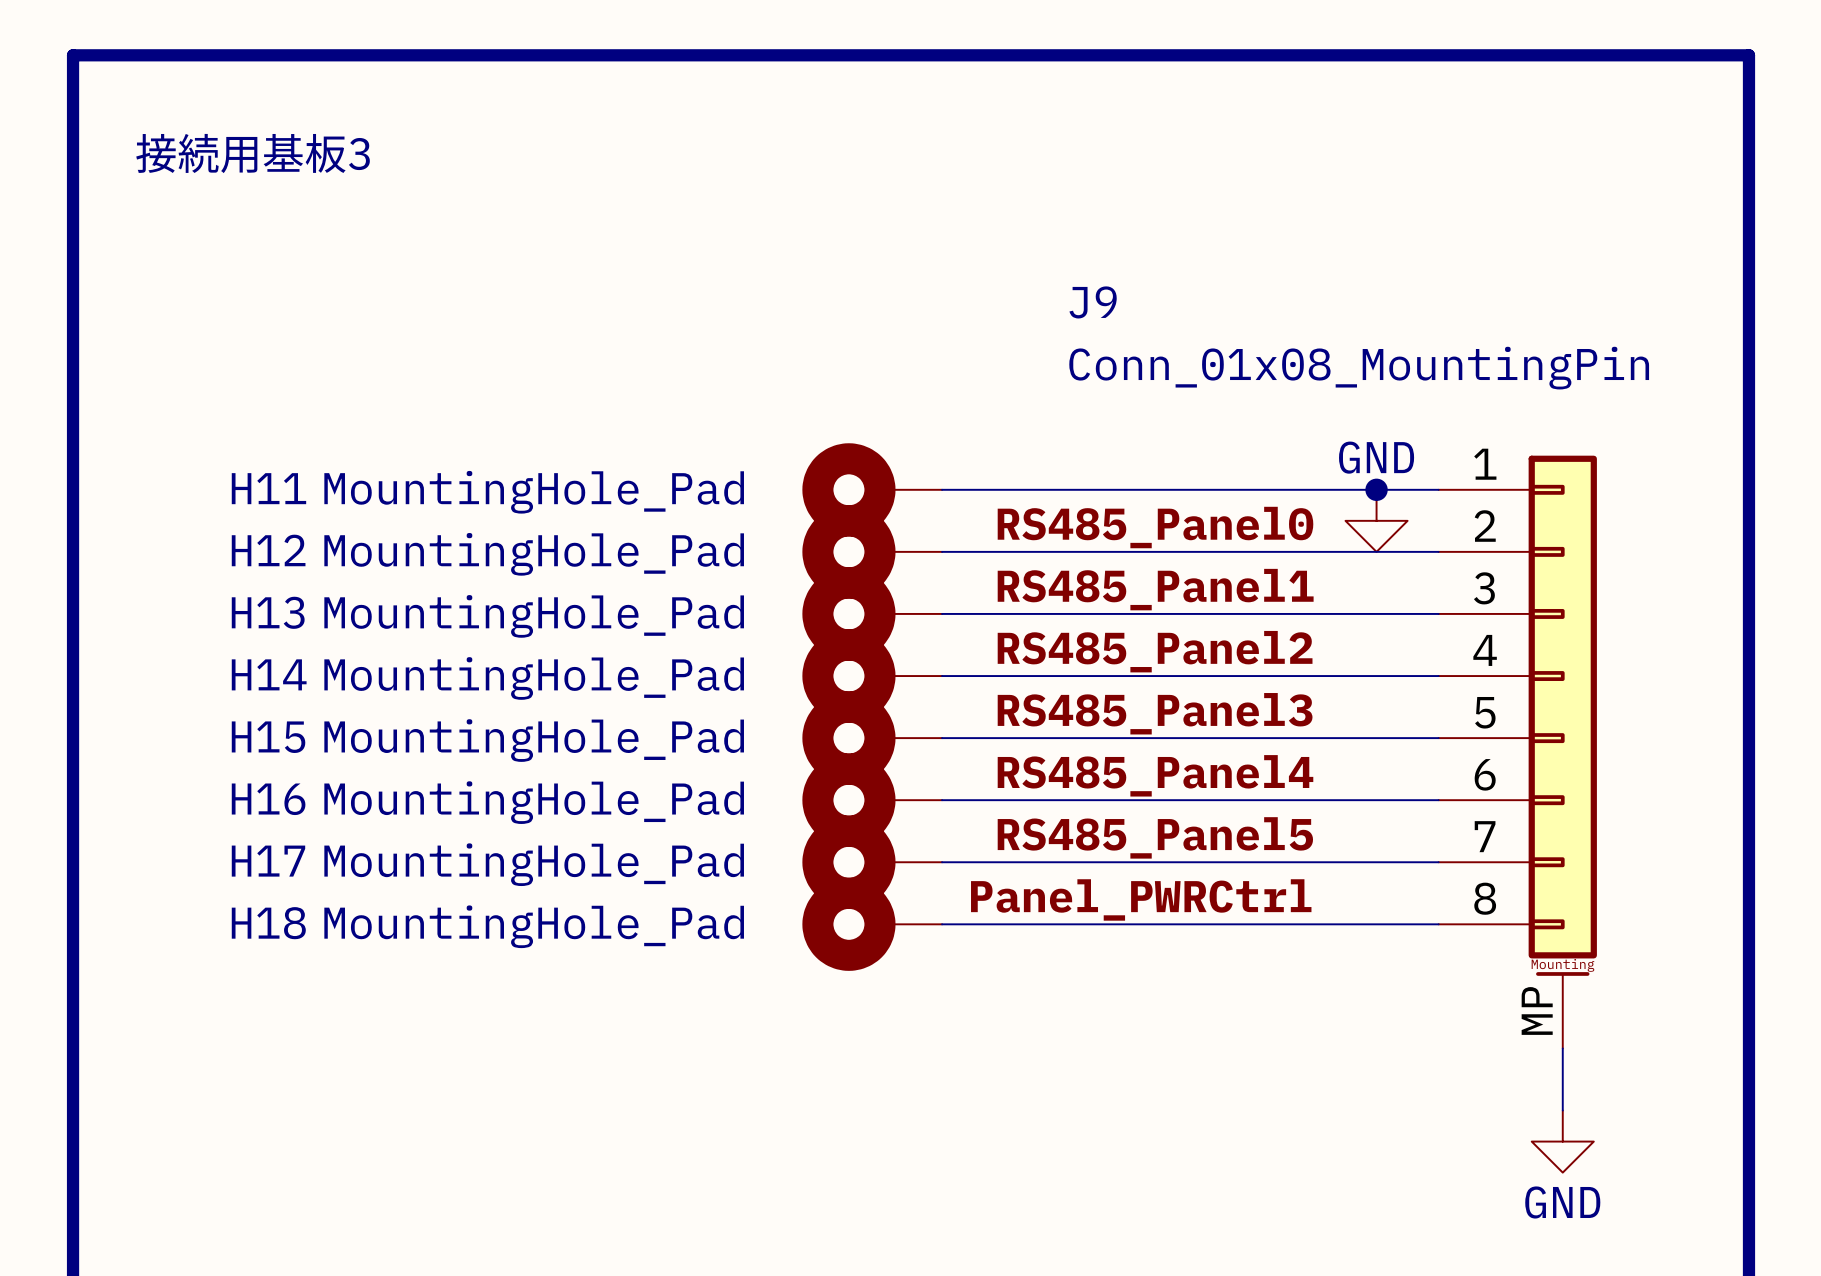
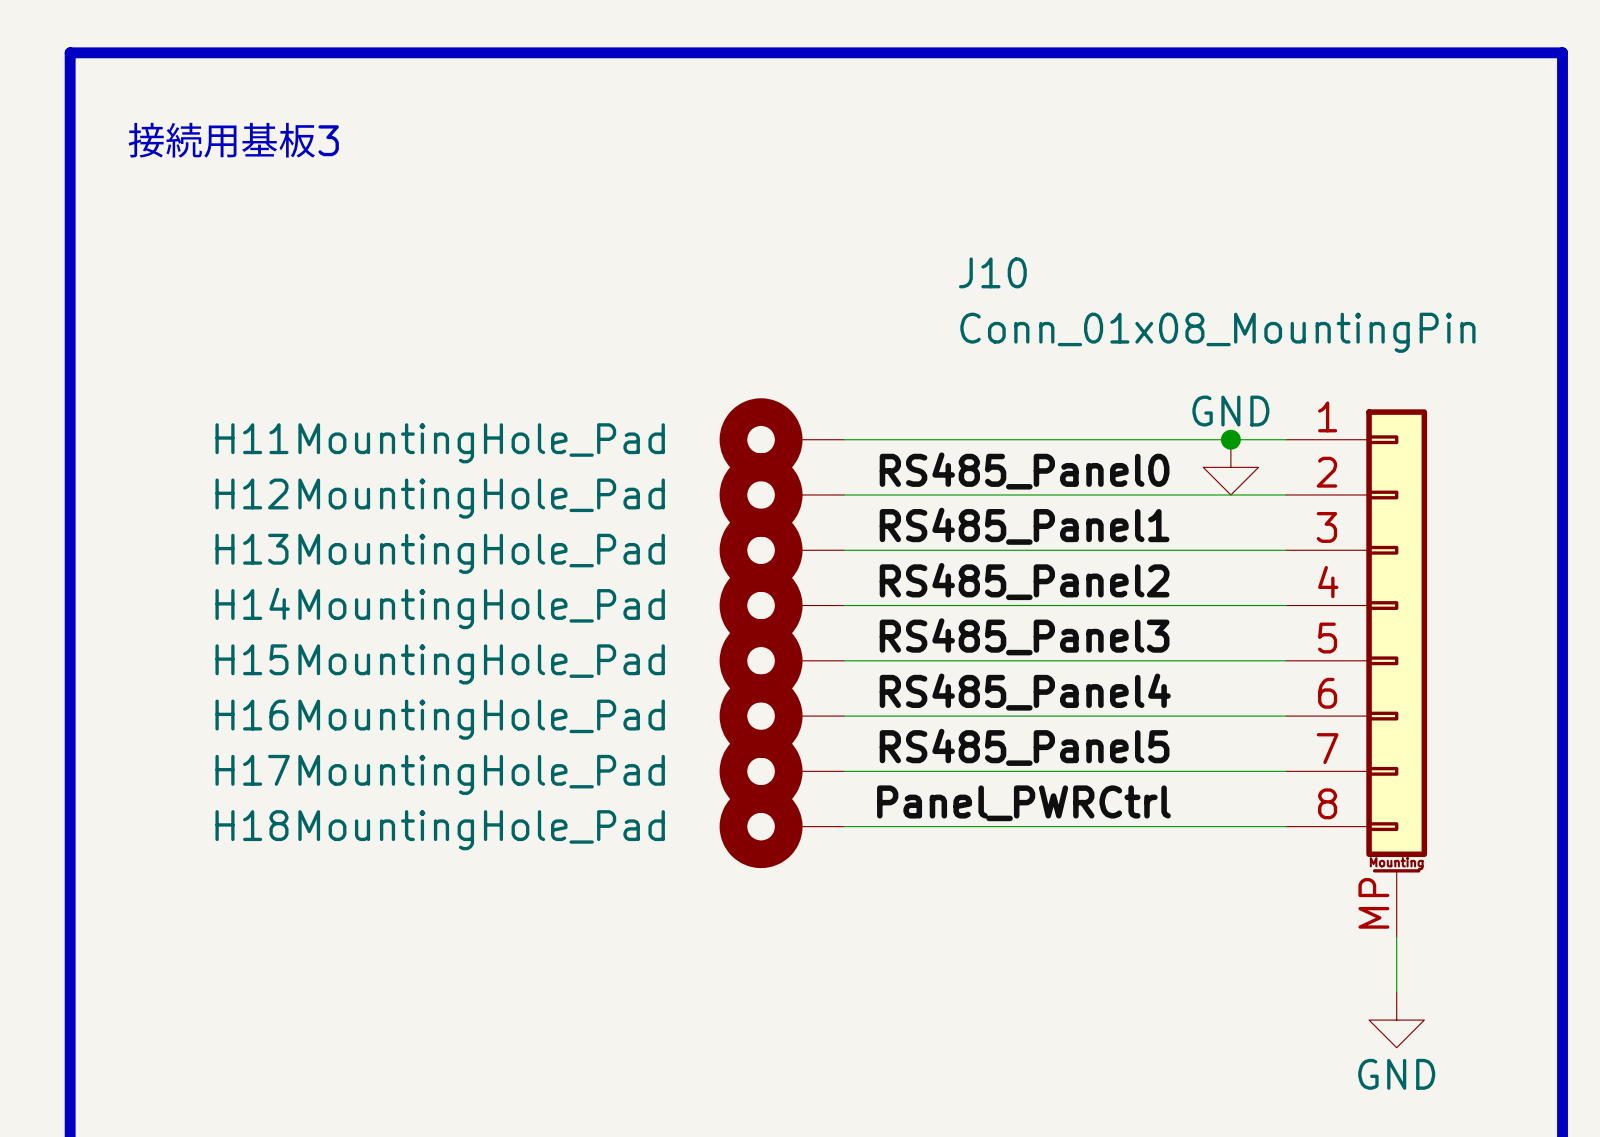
J9 name: J9 (1093, 302) -> J10 (992, 272)

